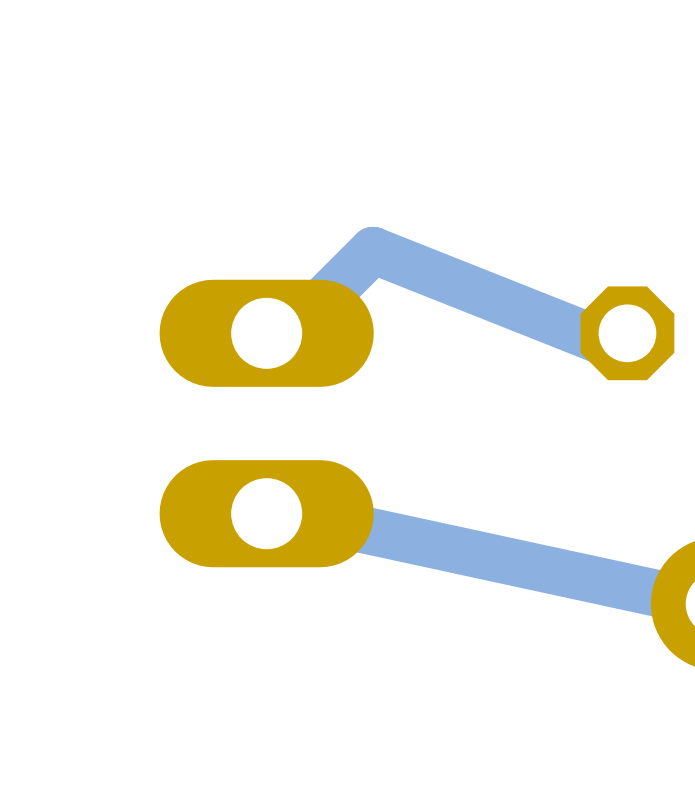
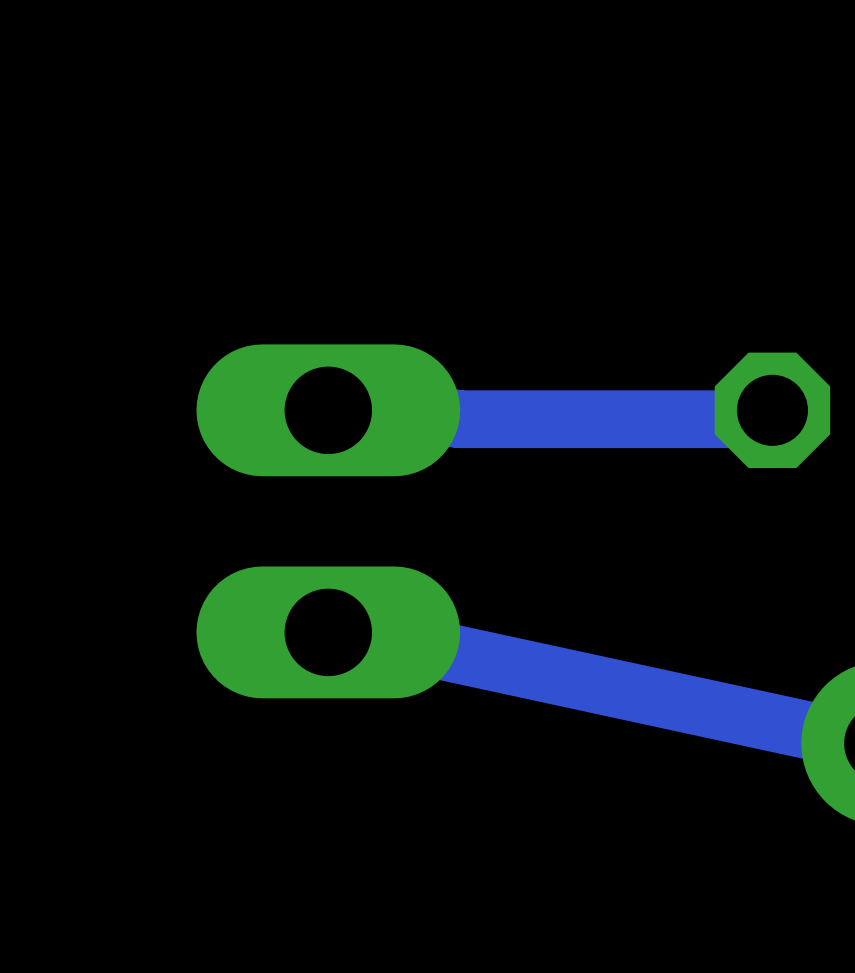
track: (297, 326) (373, 250) (600, 340) -> (366, 401) (459, 419) (739, 419)

